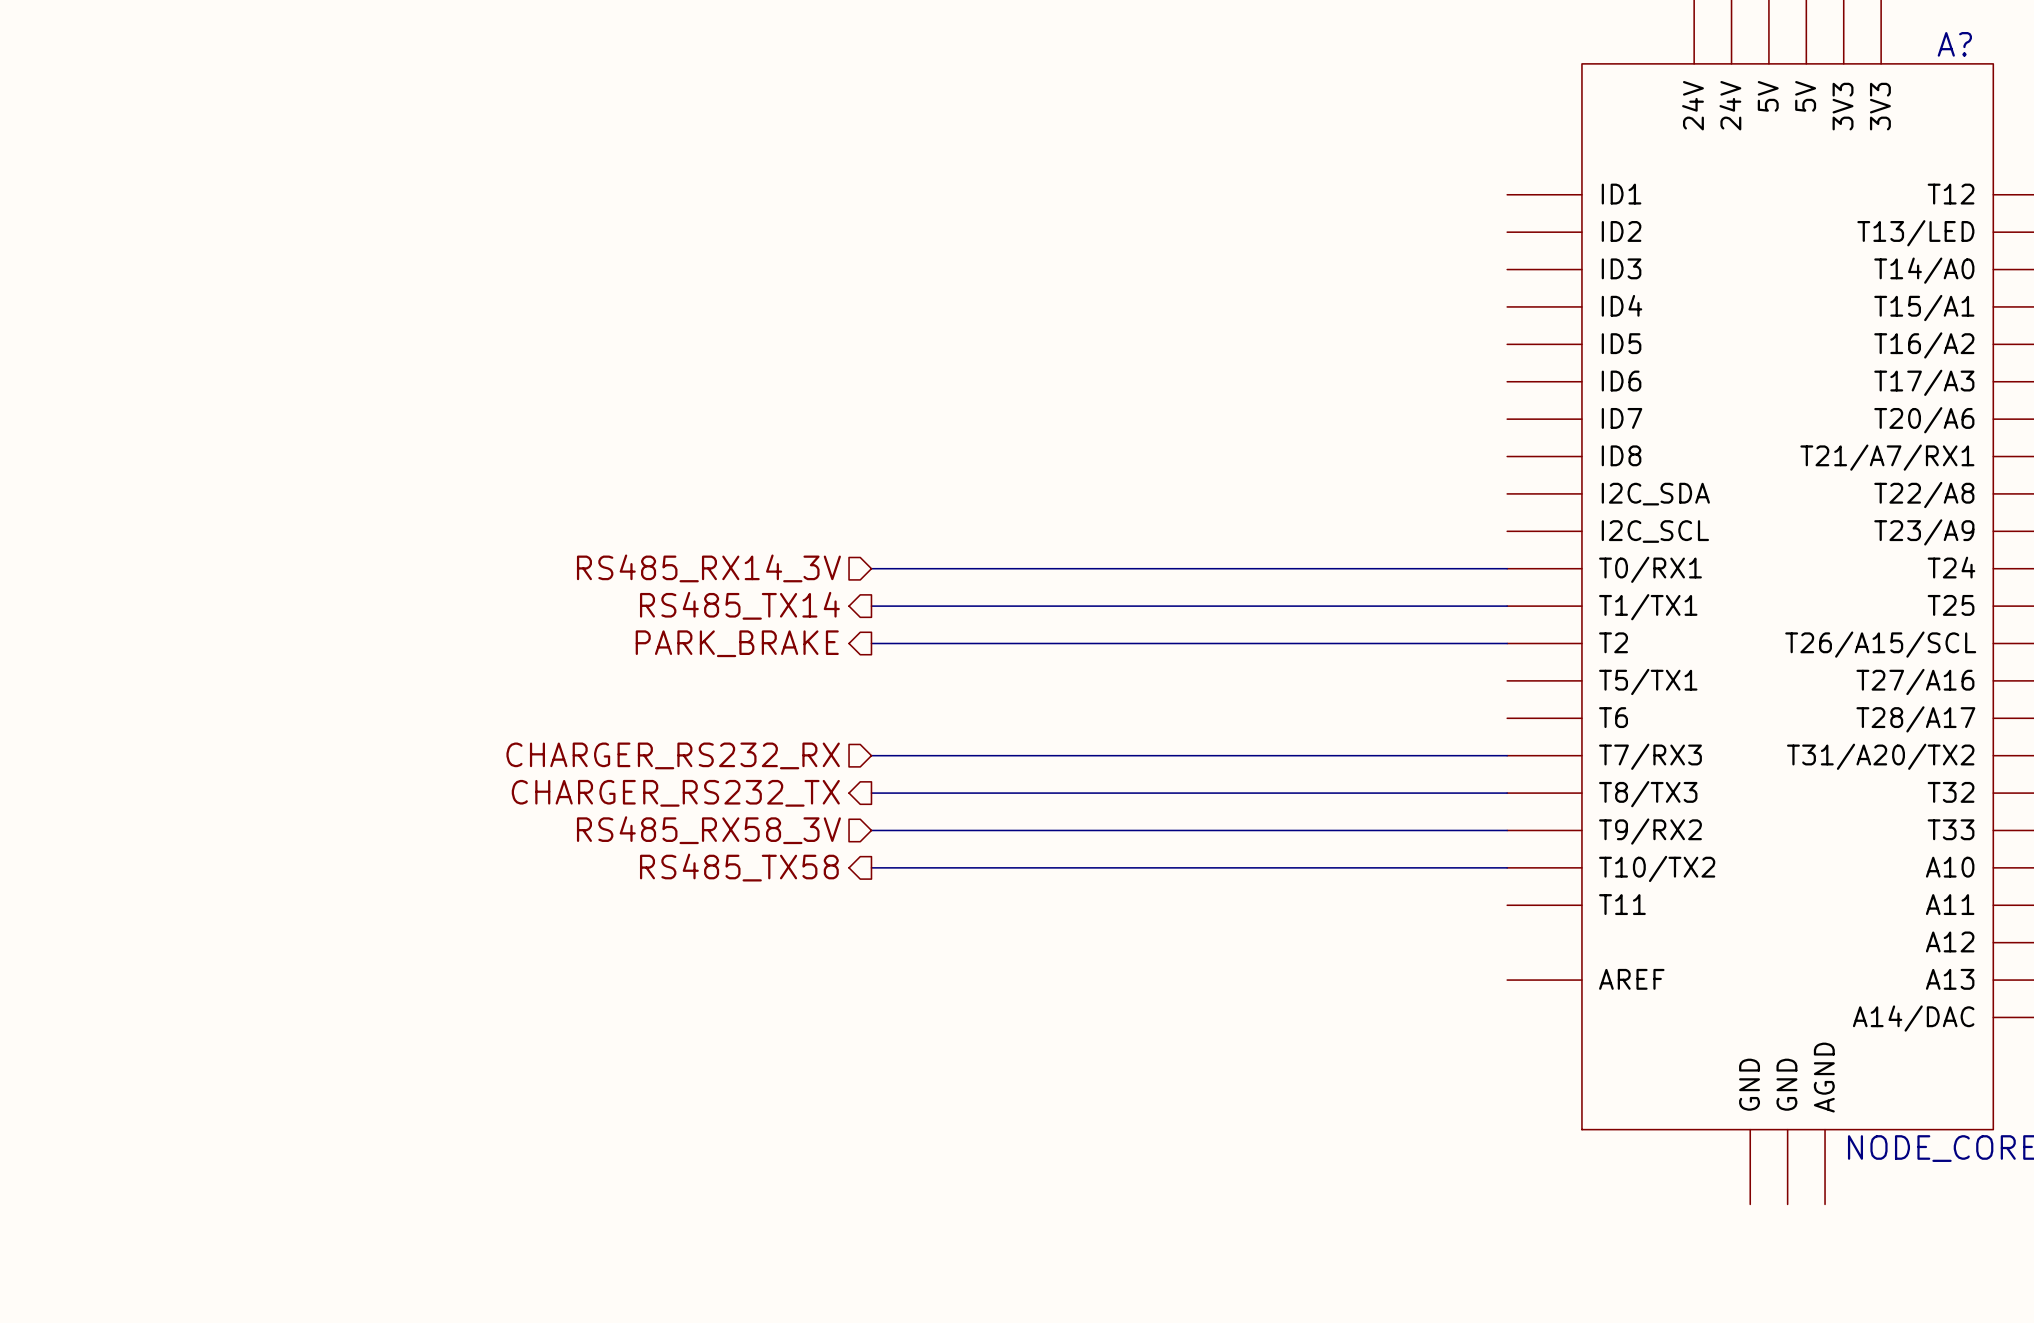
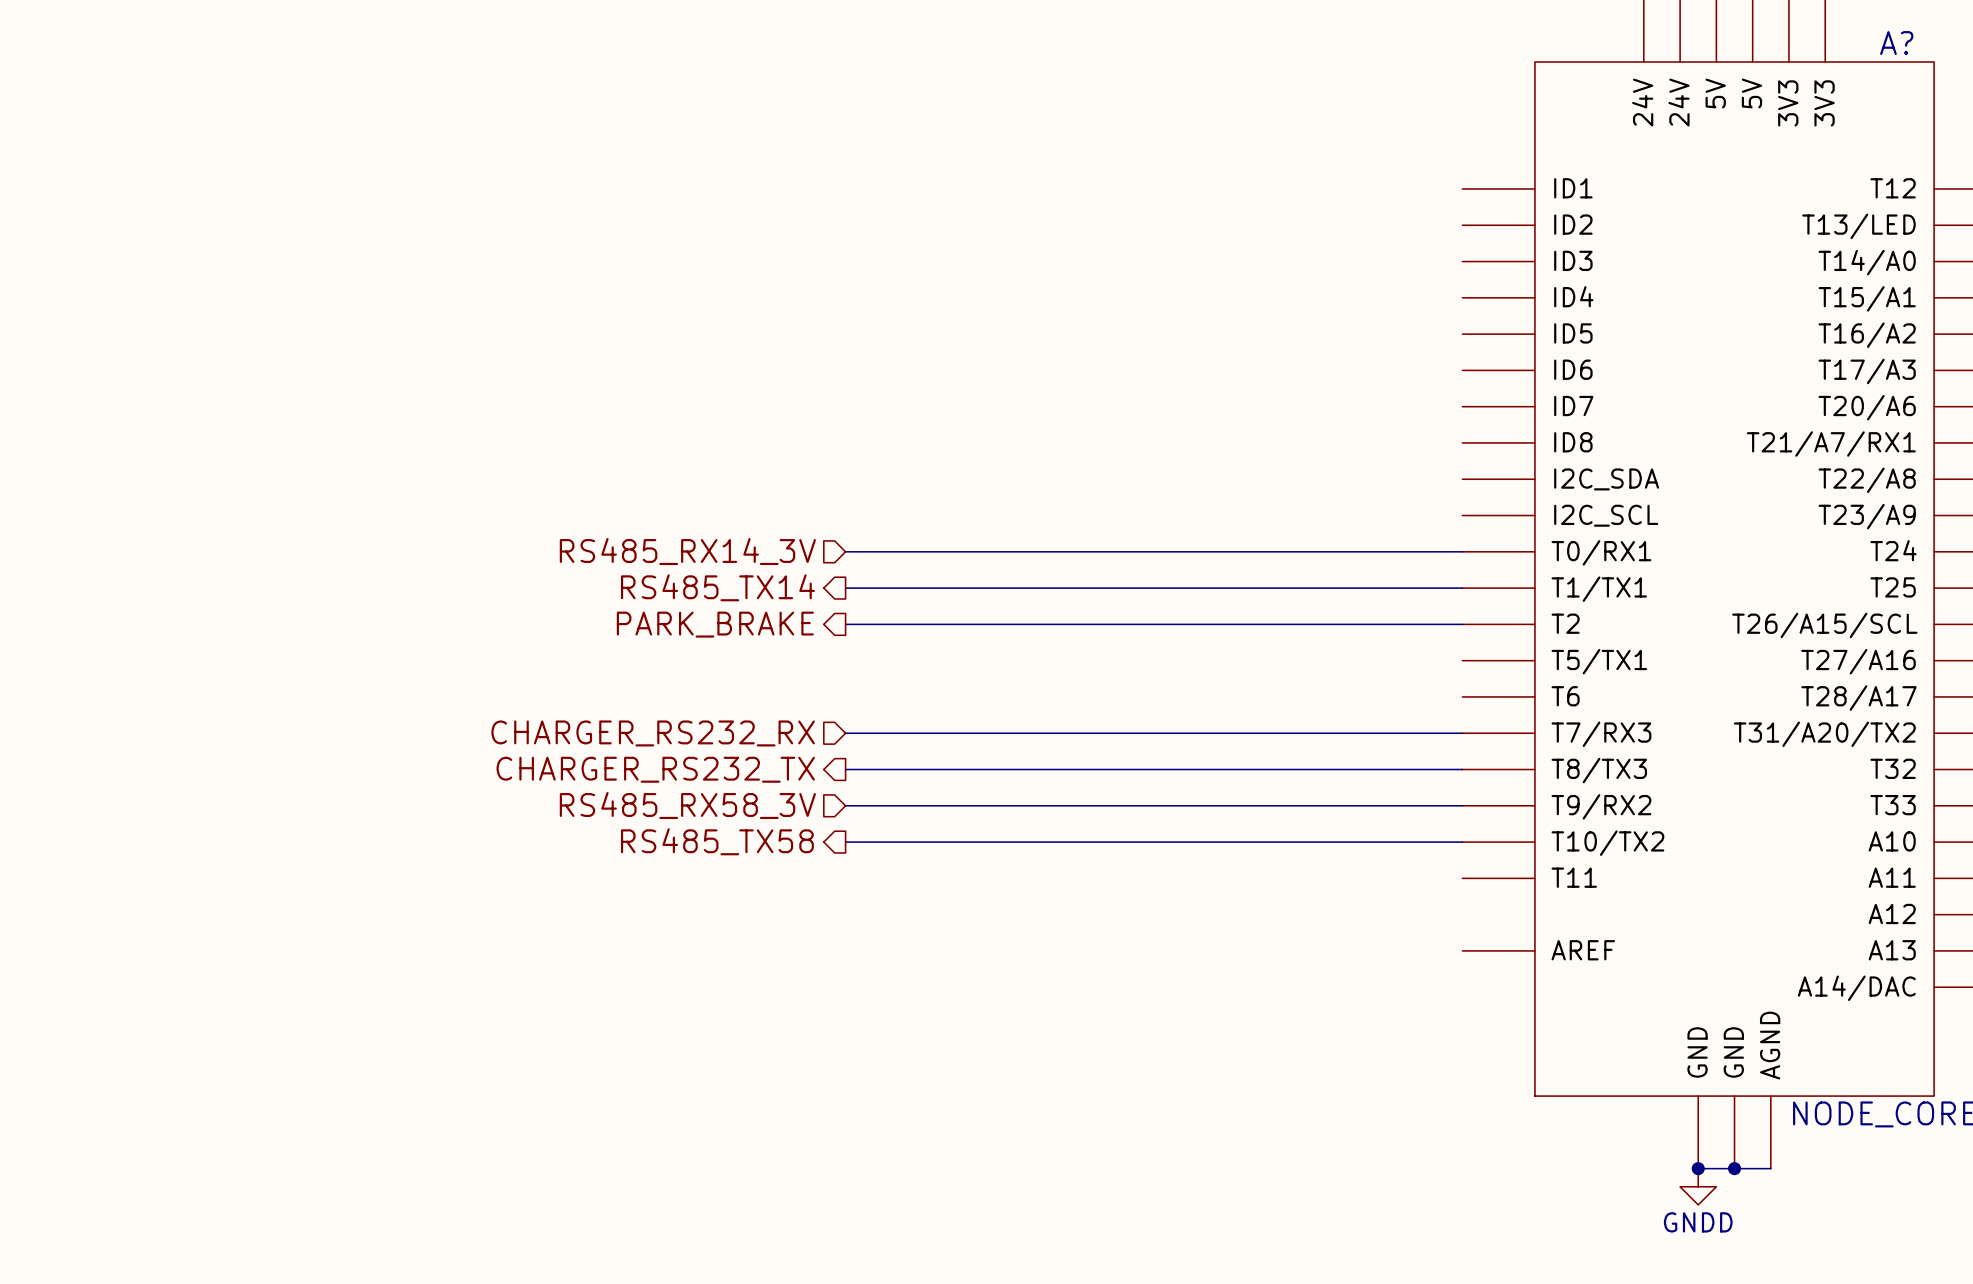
wire: none -> (1698, 1168) (1770, 1168)
junction: none -> (1698, 1168)
junction: none -> (1734, 1168)
power symbol: none -> GNDD (1698, 1186)

